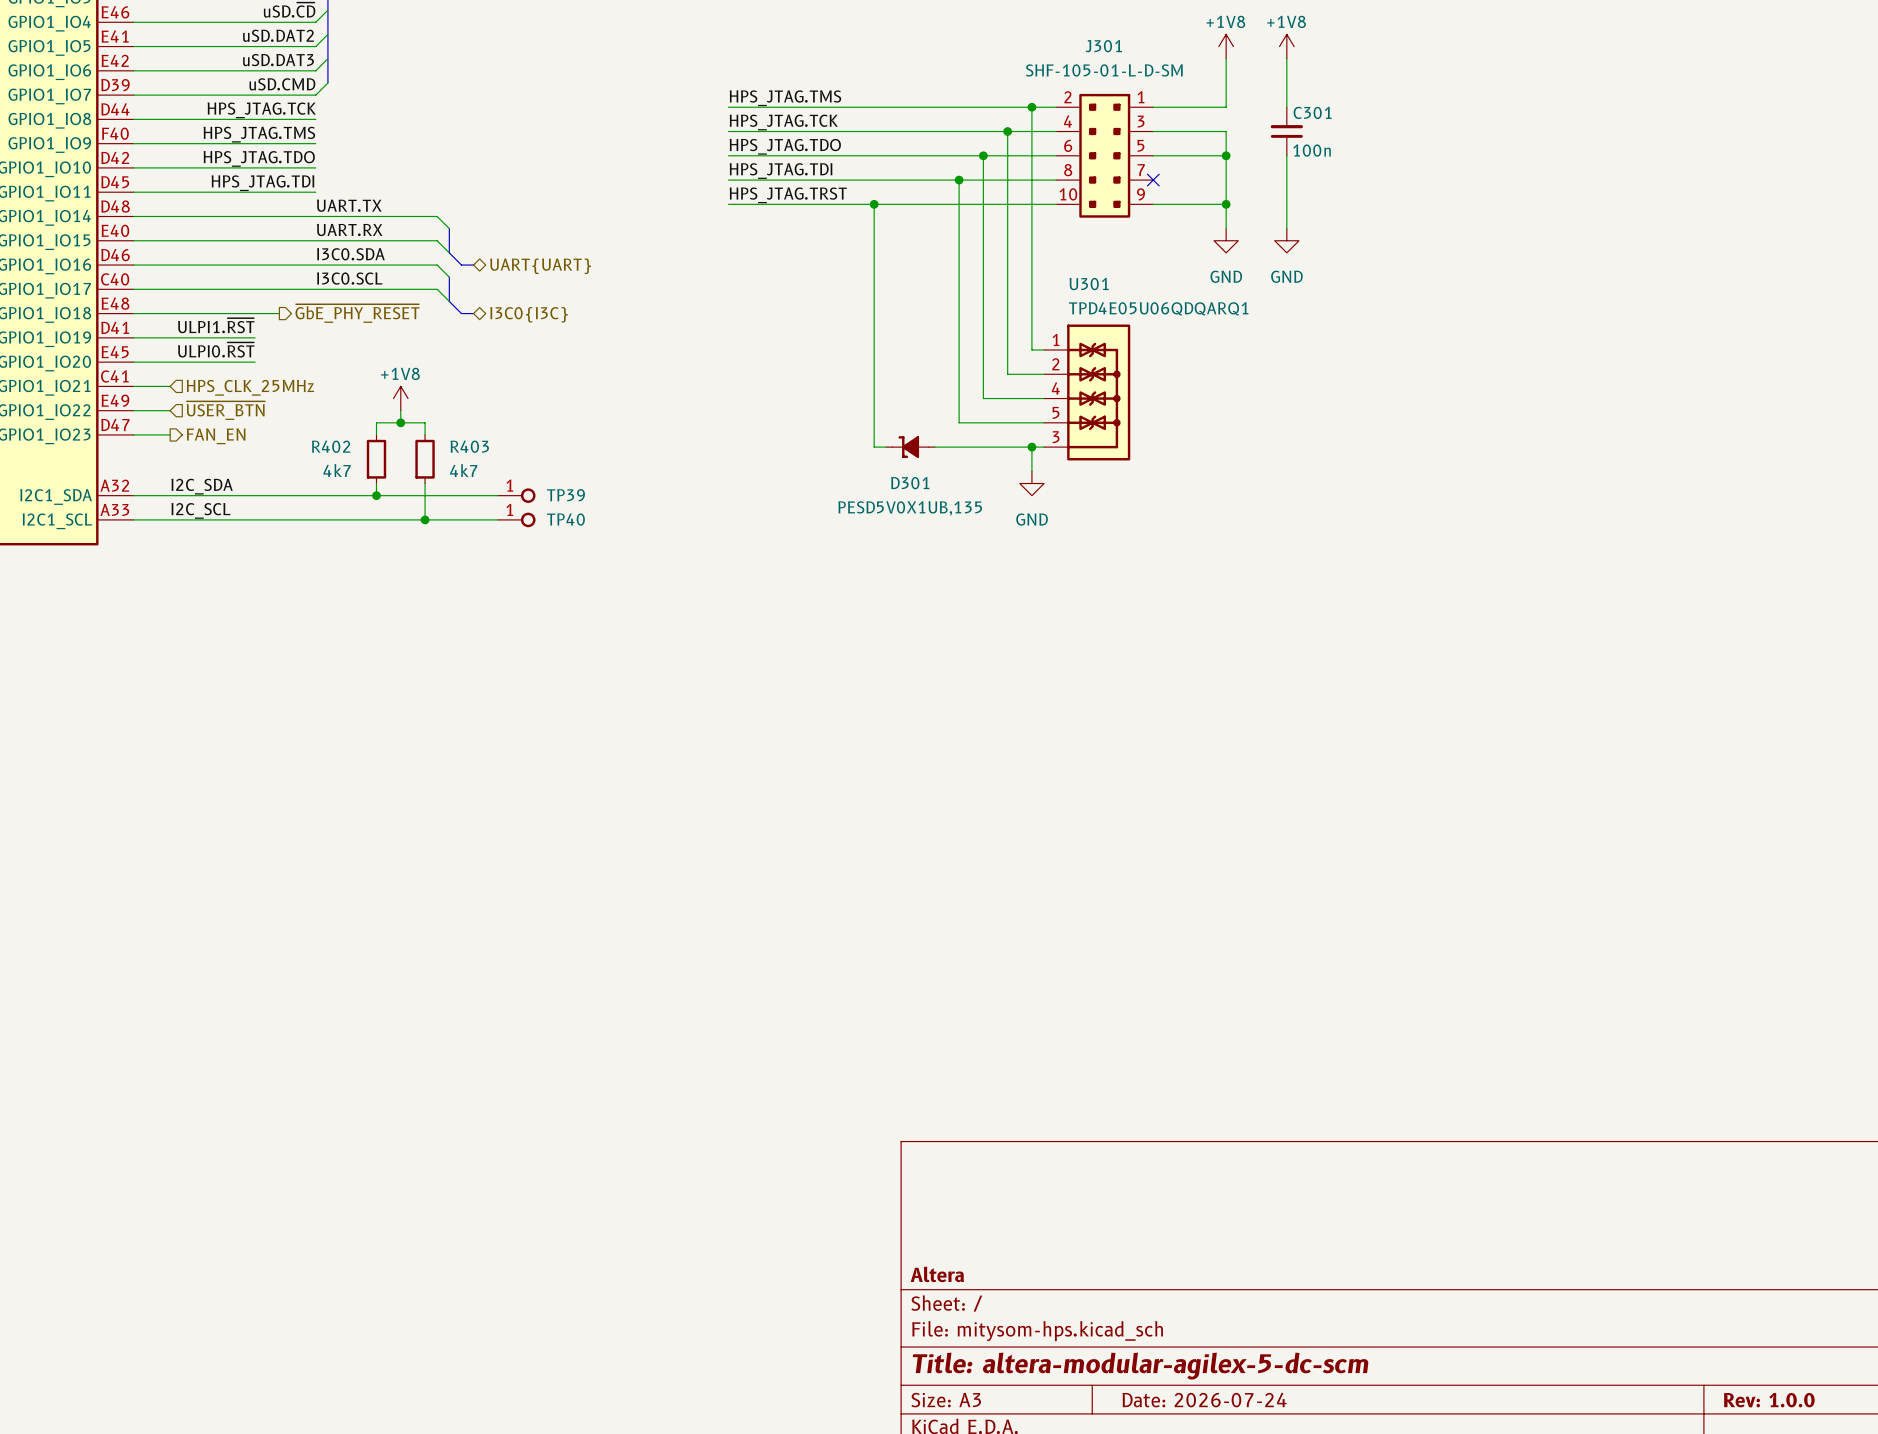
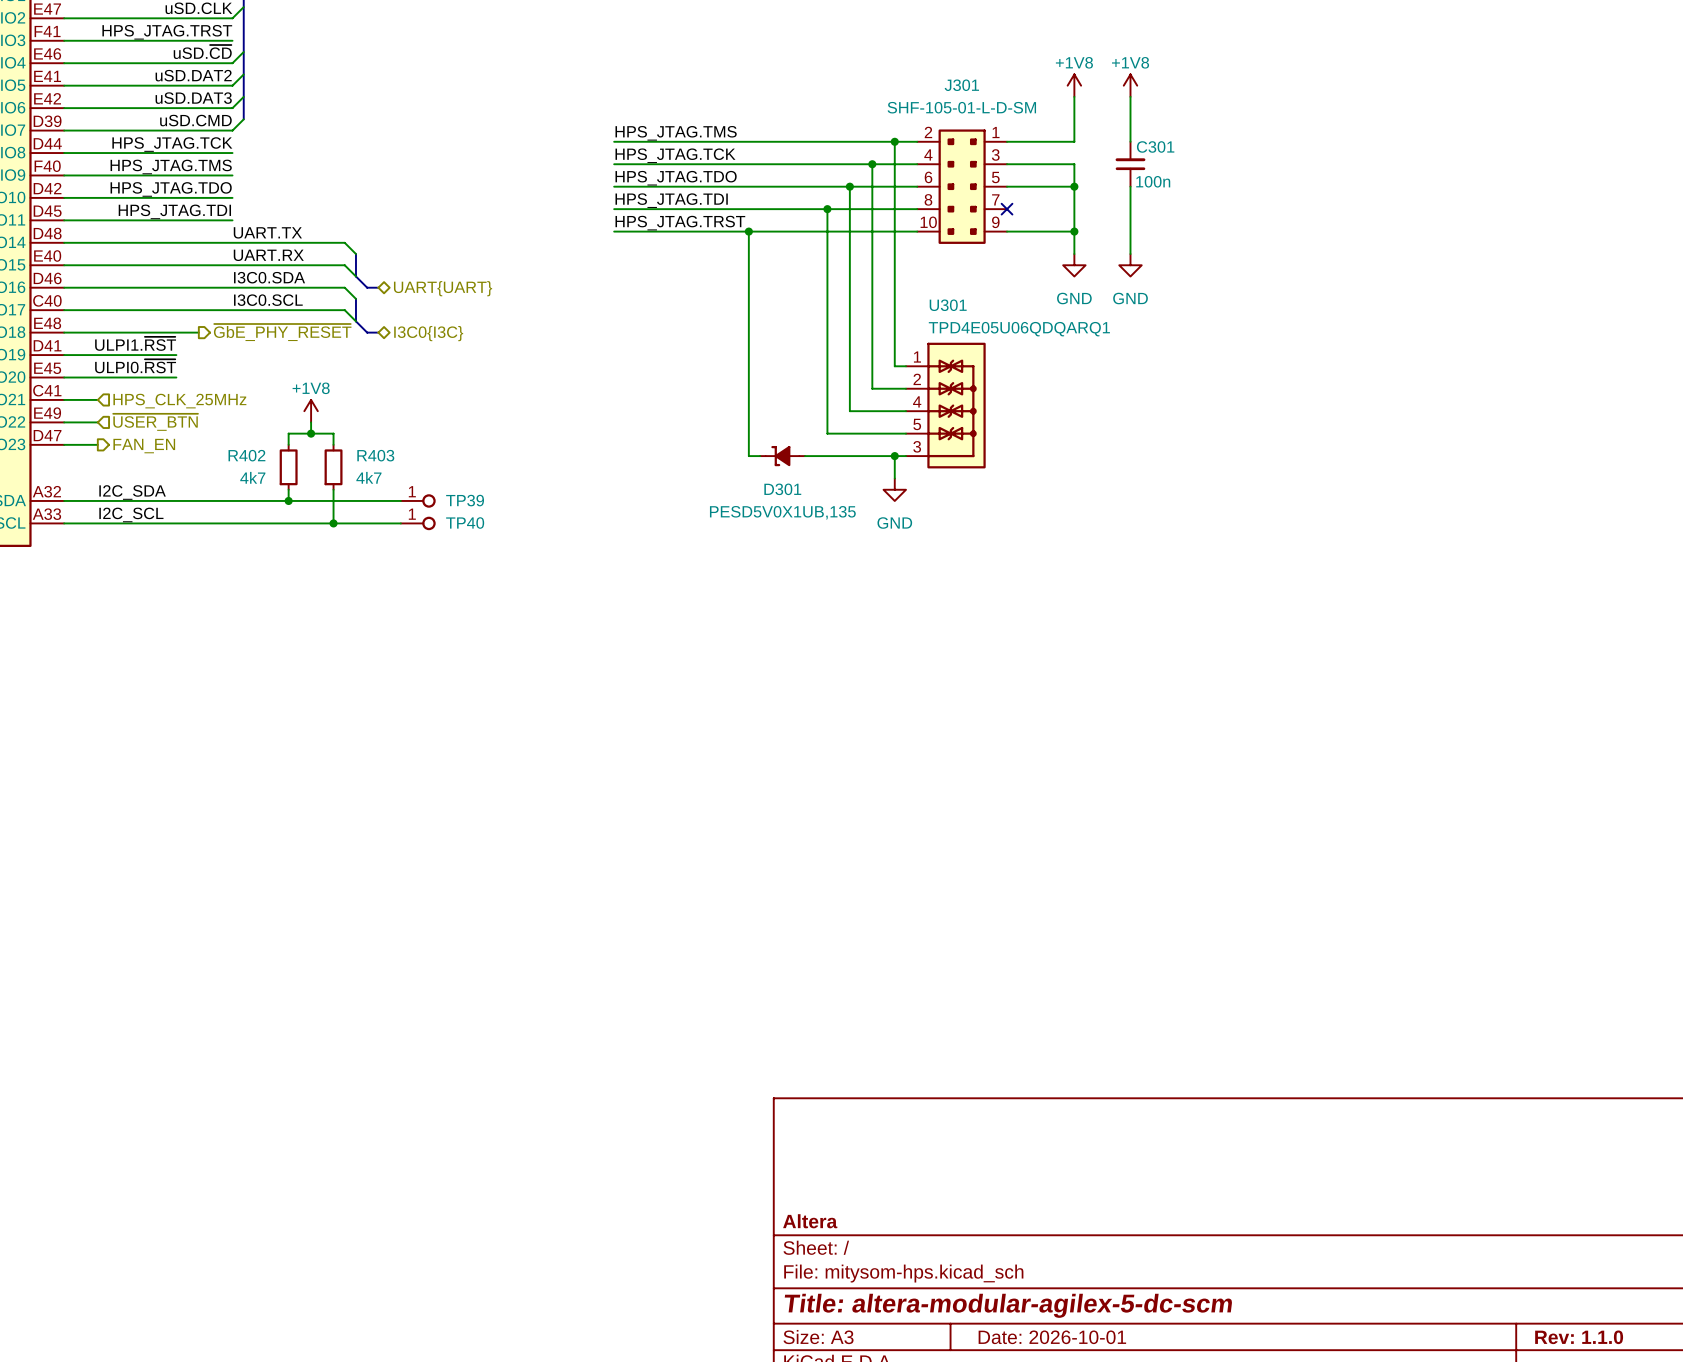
title block: Date: 2026-07-24 (1204, 1400) -> Date: 2026-10-01 (1052, 1337)
title block: Rev: 1.0.0 (1769, 1400) -> Rev: 1.1.0 (1579, 1337)

